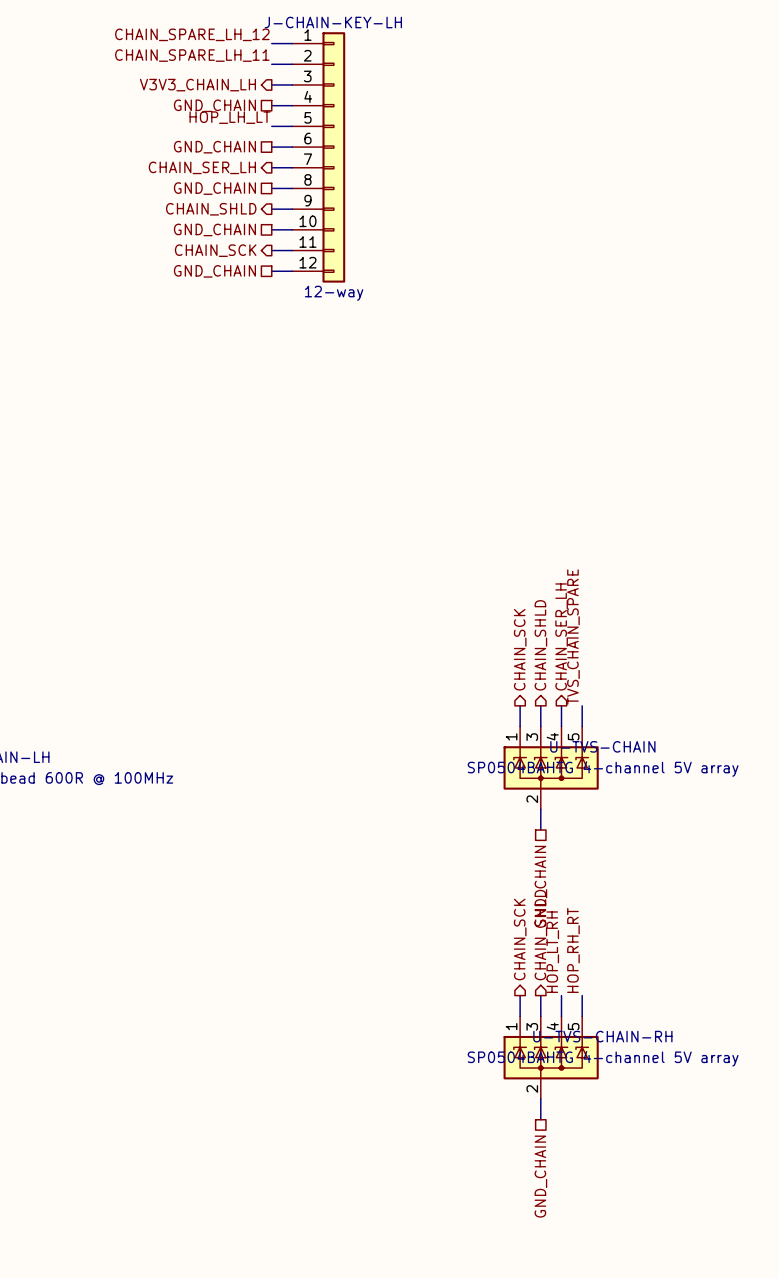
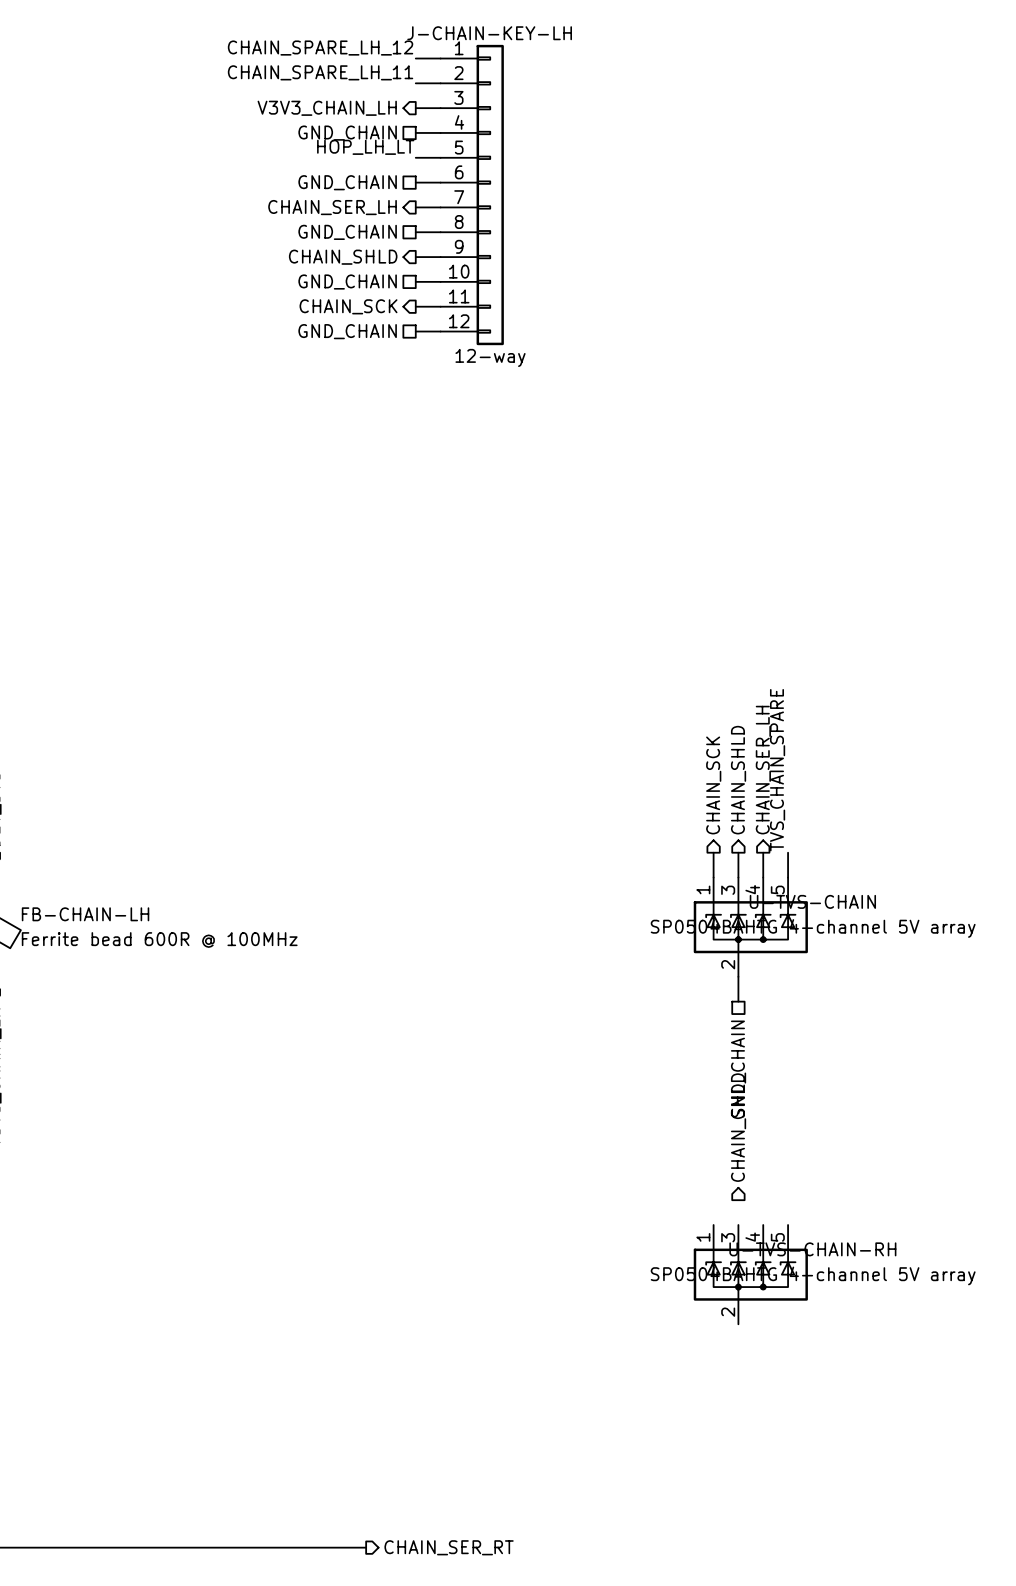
hierarchical label: CHAIN_SCK (520, 939) -> none
label: HOP_RH_RT (573, 950) -> none
label: HOP_LT_RH (552, 952) -> none
wire: (520, 995) (520, 1016) -> none
wire: (540, 995) (540, 1016) -> none
wire: (561, 995) (561, 1016) -> none
wire: (582, 995) (582, 1016) -> none
wire: (540, 1099) (540, 1119) -> none
hierarchical label: GND_CHAIN (540, 1176) -> none

